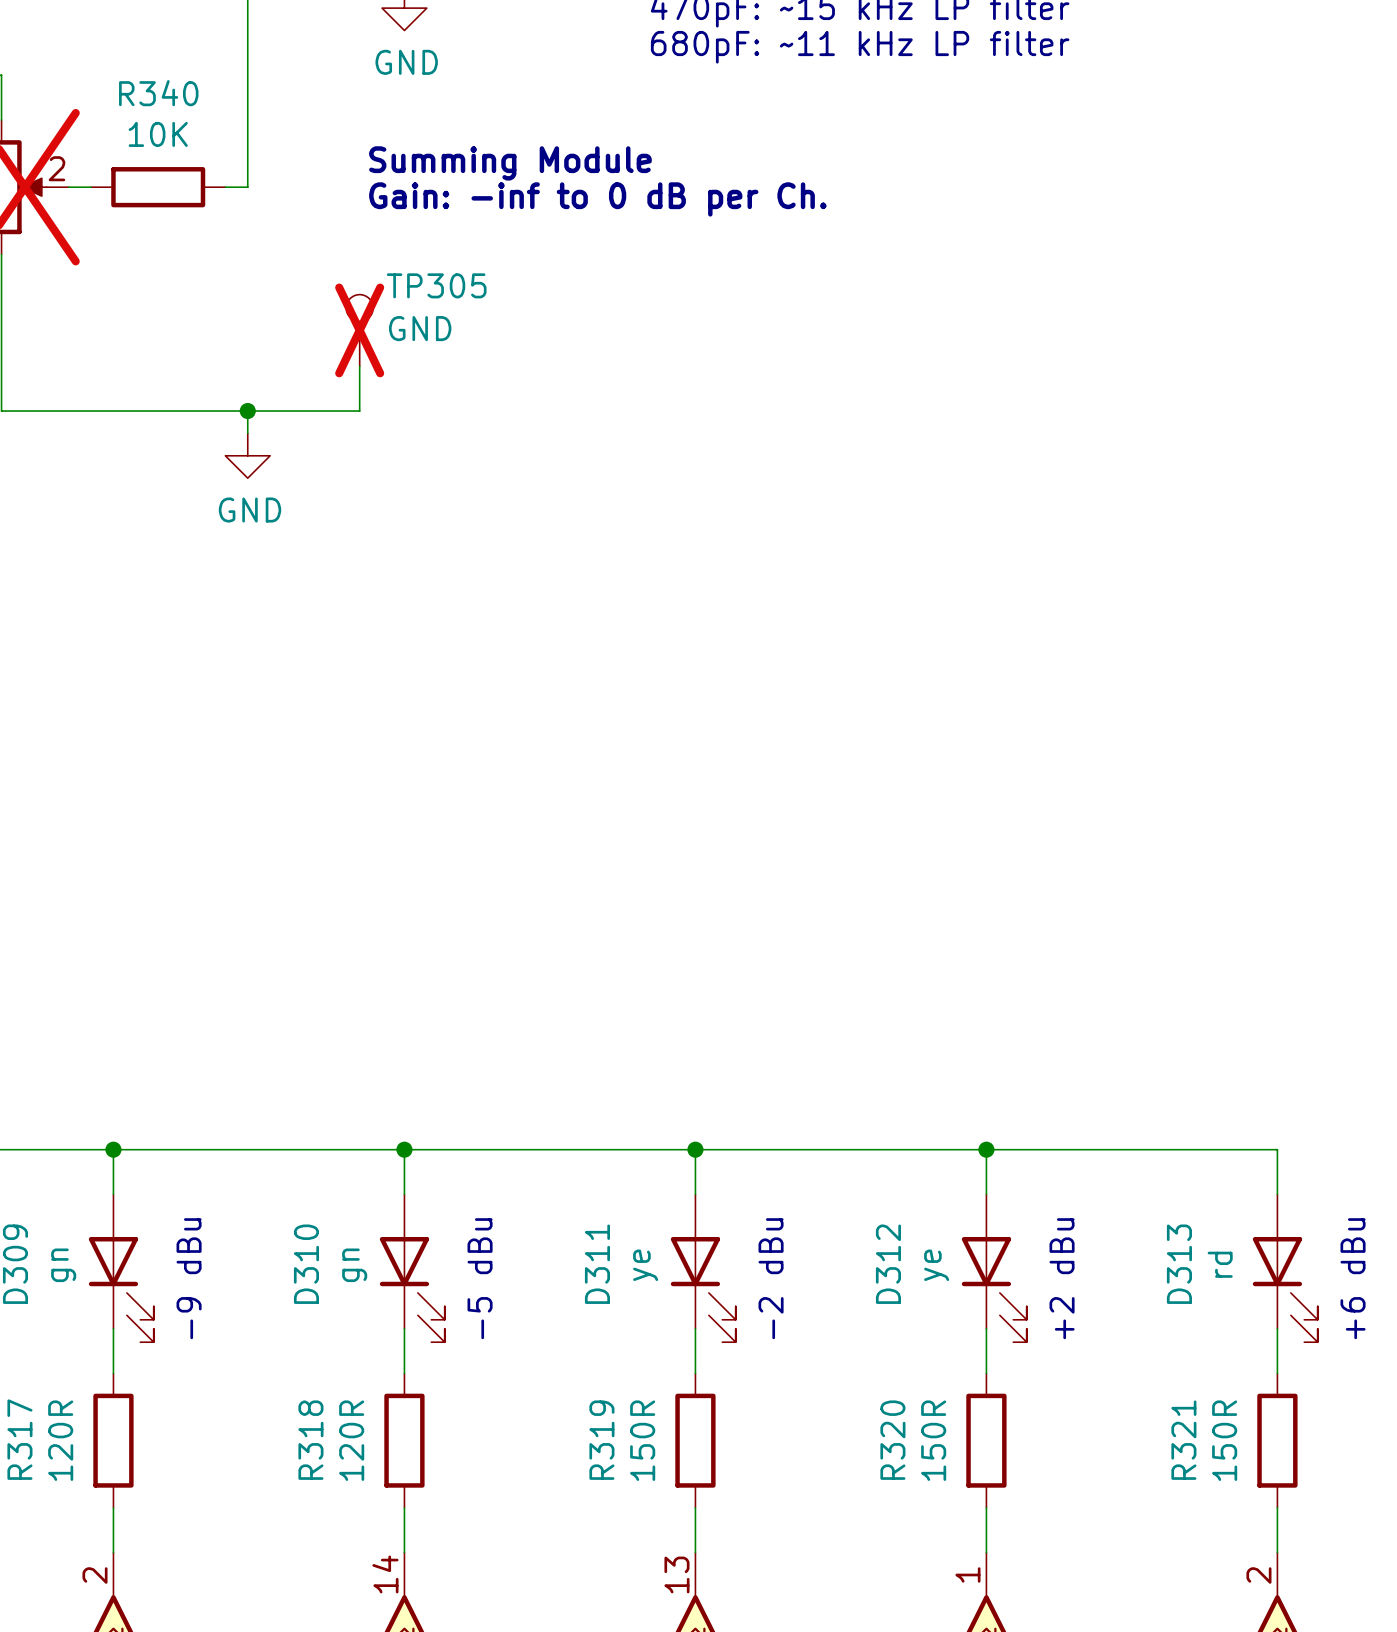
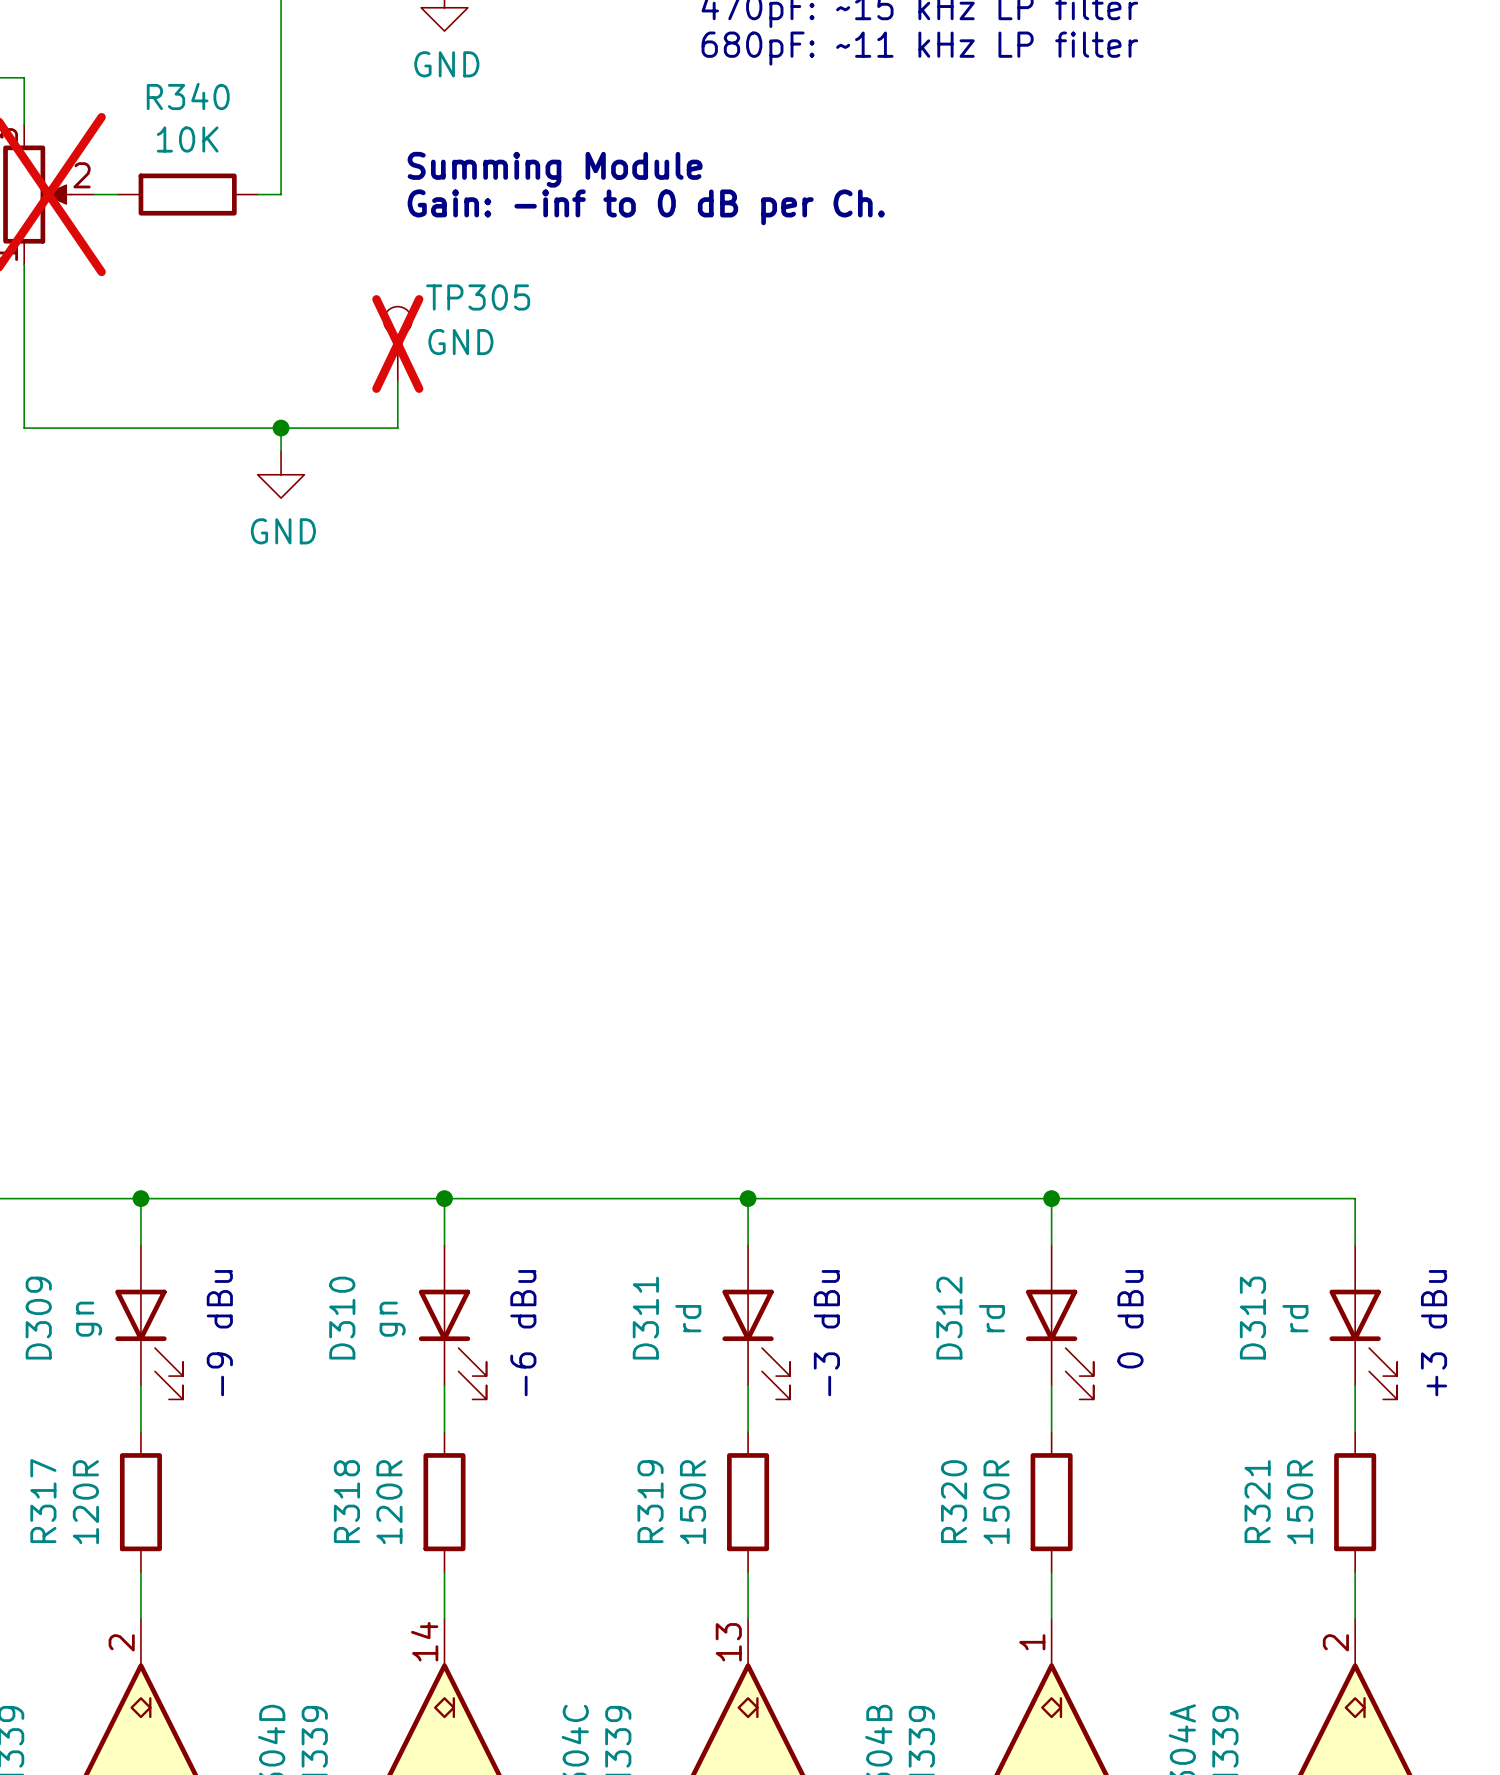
D311 value: ye (645, 1265) -> rd (688, 1318)
D312 value: ye (936, 1265) -> rd (991, 1318)
text: -5 dBu (480, 1278) -> -6 dBu (523, 1333)
text: -2 dBu (771, 1278) -> -3 dBu (826, 1333)
text: +2 dBu (1062, 1278) -> 0 dBu (1130, 1319)
text: +6 dBu (1353, 1278) -> +3 dBu (1434, 1333)

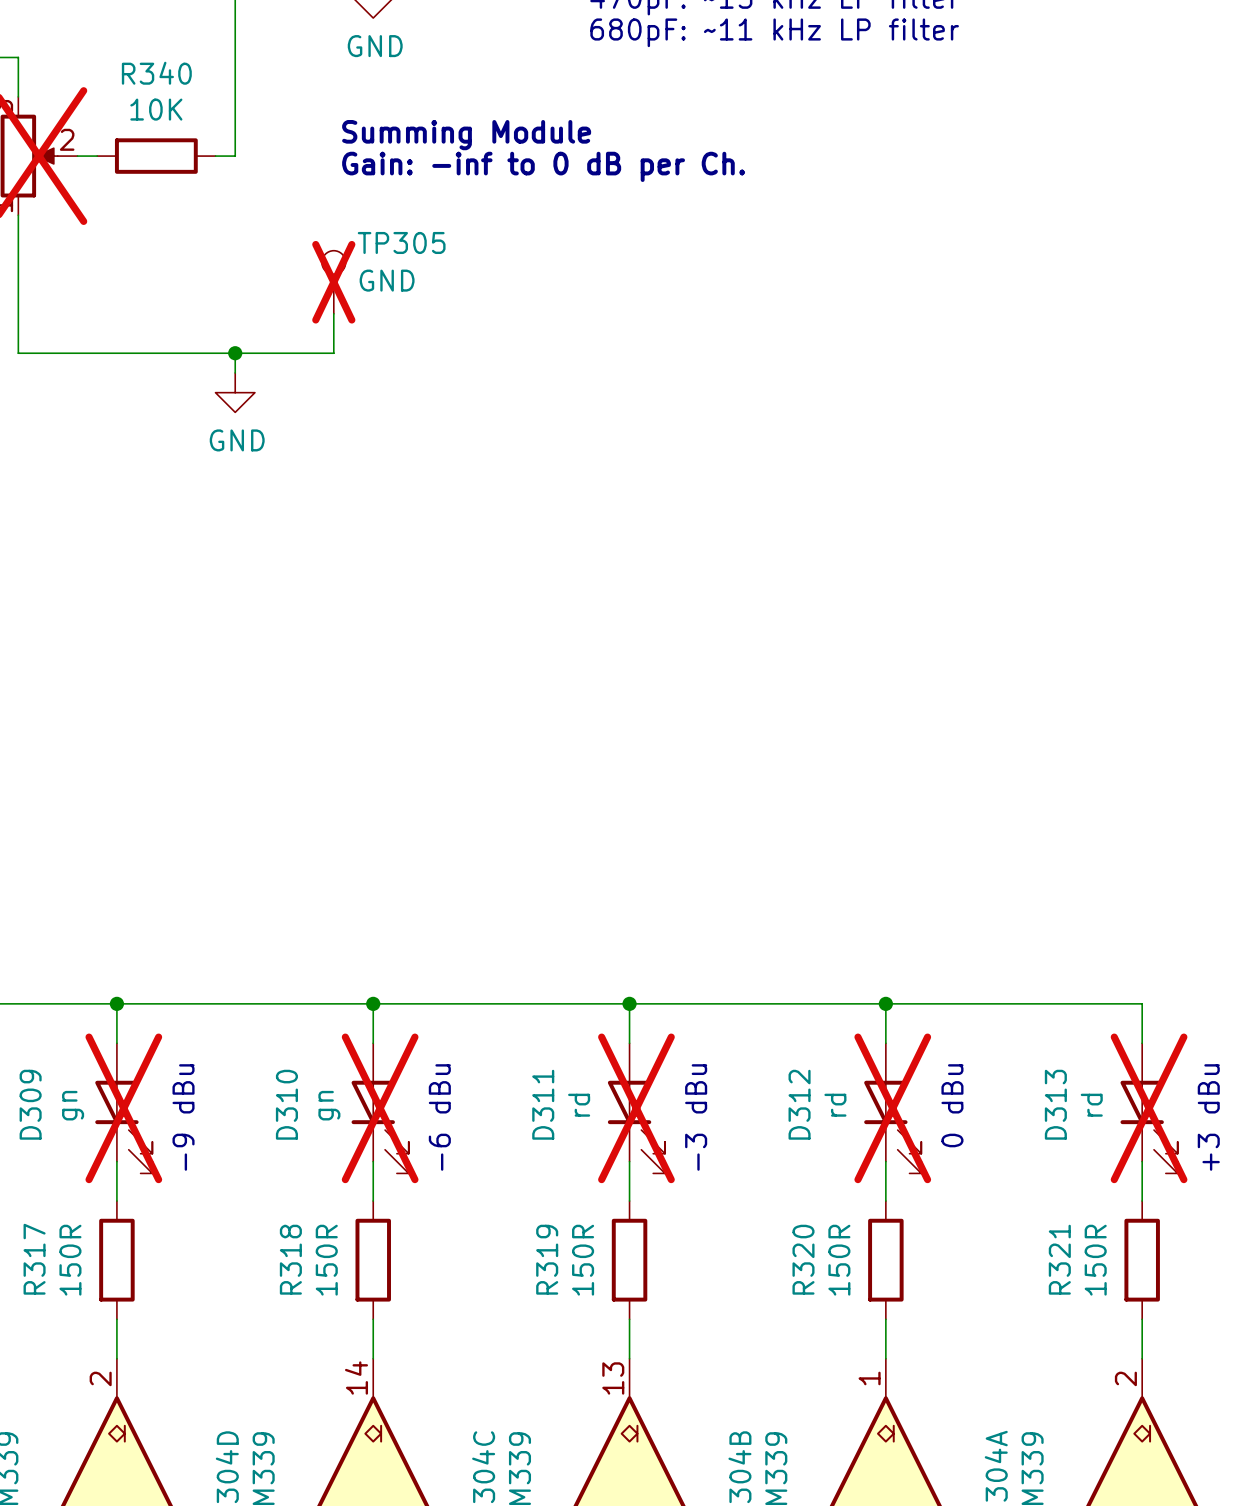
D309 do-not-place cross: none -> (123, 1108)
D310 do-not-place cross: none -> (380, 1108)
D311 do-not-place cross: none -> (636, 1108)
D312 do-not-place cross: none -> (892, 1108)
D313 do-not-place cross: none -> (1149, 1108)
R317 value: 120R (85, 1502) -> 150R (70, 1260)
R318 value: 120R (389, 1502) -> 150R (326, 1260)

